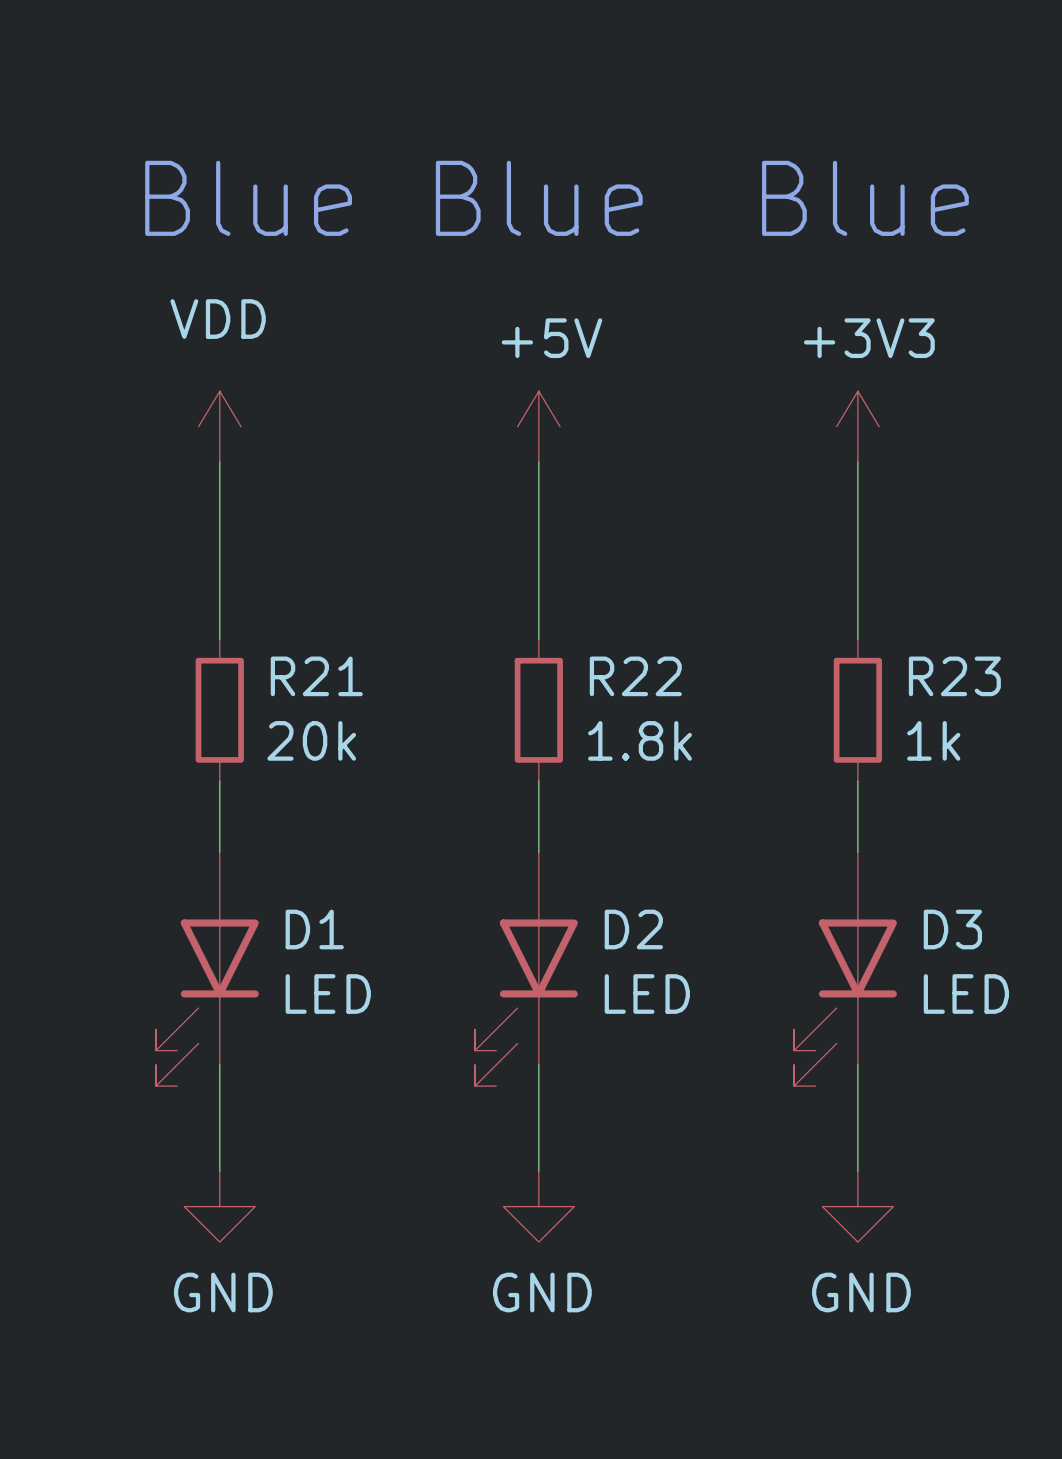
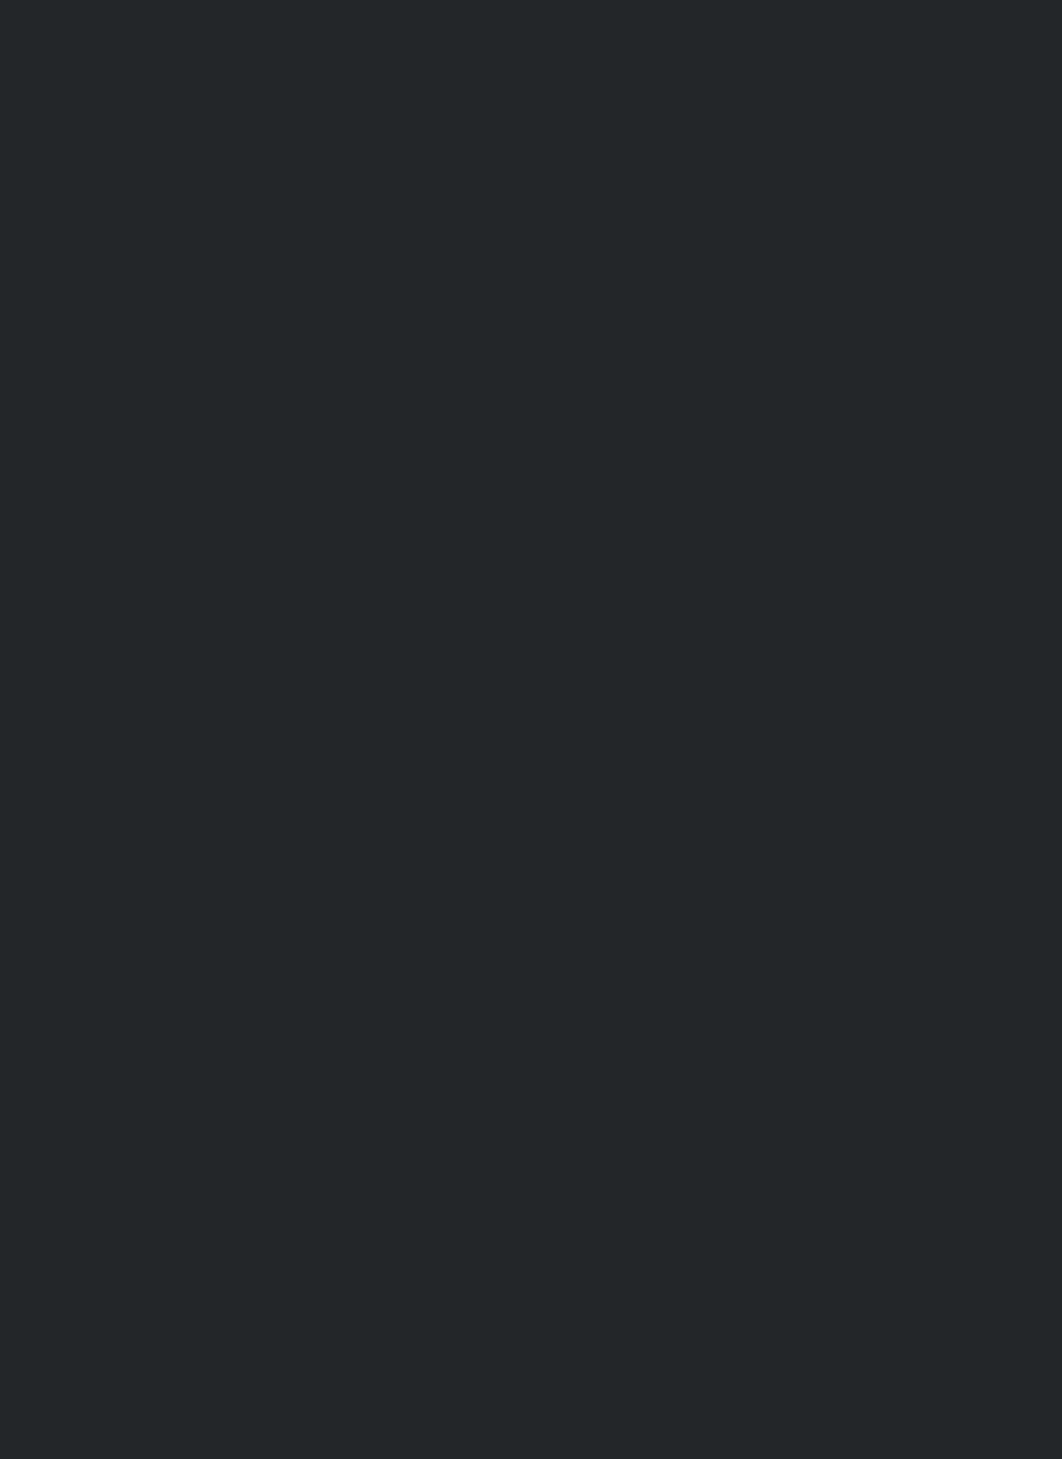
text: Blue (248, 198) -> none
text: Blue (539, 198) -> none
text: Blue (865, 198) -> none
power symbol: VDD (219, 426) -> none
power symbol: +5V (538, 426) -> none
power symbol: +3V3 (857, 426) -> none
wire: (219, 462) (219, 639) -> none
wire: (538, 462) (538, 639) -> none
wire: (857, 462) (857, 639) -> none
R21: 20k (219, 710) -> none
R22: 1.8k (538, 710) -> none
R23: 1k (857, 710) -> none
wire: (219, 781) (219, 852) -> none
wire: (538, 781) (538, 852) -> none
wire: (857, 781) (857, 852) -> none
D1: LED (207, 969) -> none
D2: LED (526, 969) -> none
D3: LED (845, 969) -> none
wire: (219, 1064) (219, 1171) -> none
wire: (538, 1064) (538, 1171) -> none
wire: (857, 1064) (857, 1171) -> none
power symbol: GND (219, 1206) -> none
power symbol: GND (538, 1206) -> none
power symbol: GND (857, 1206) -> none

